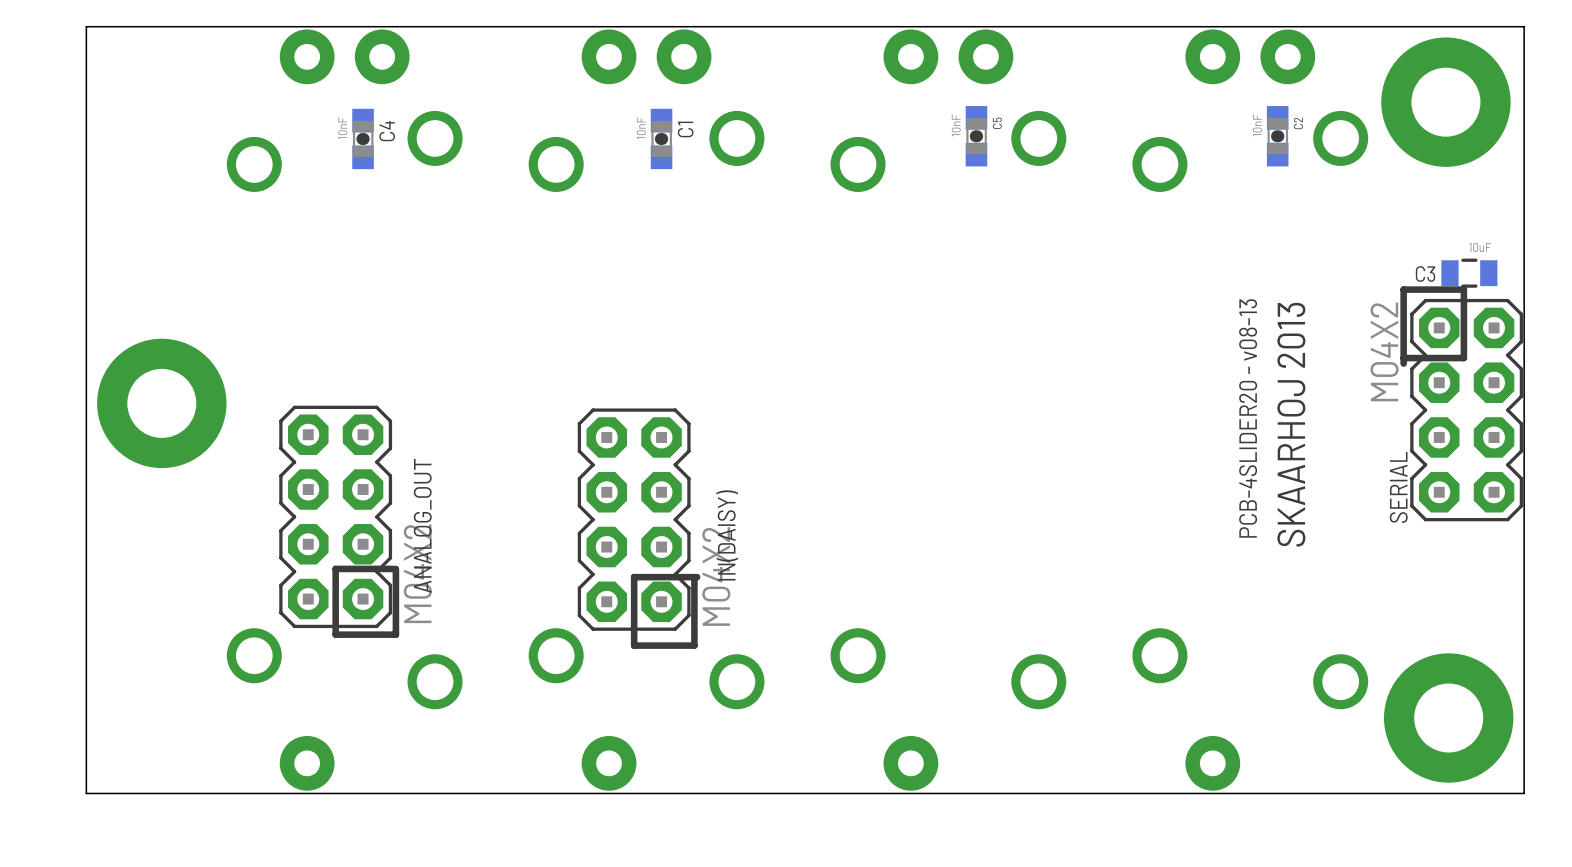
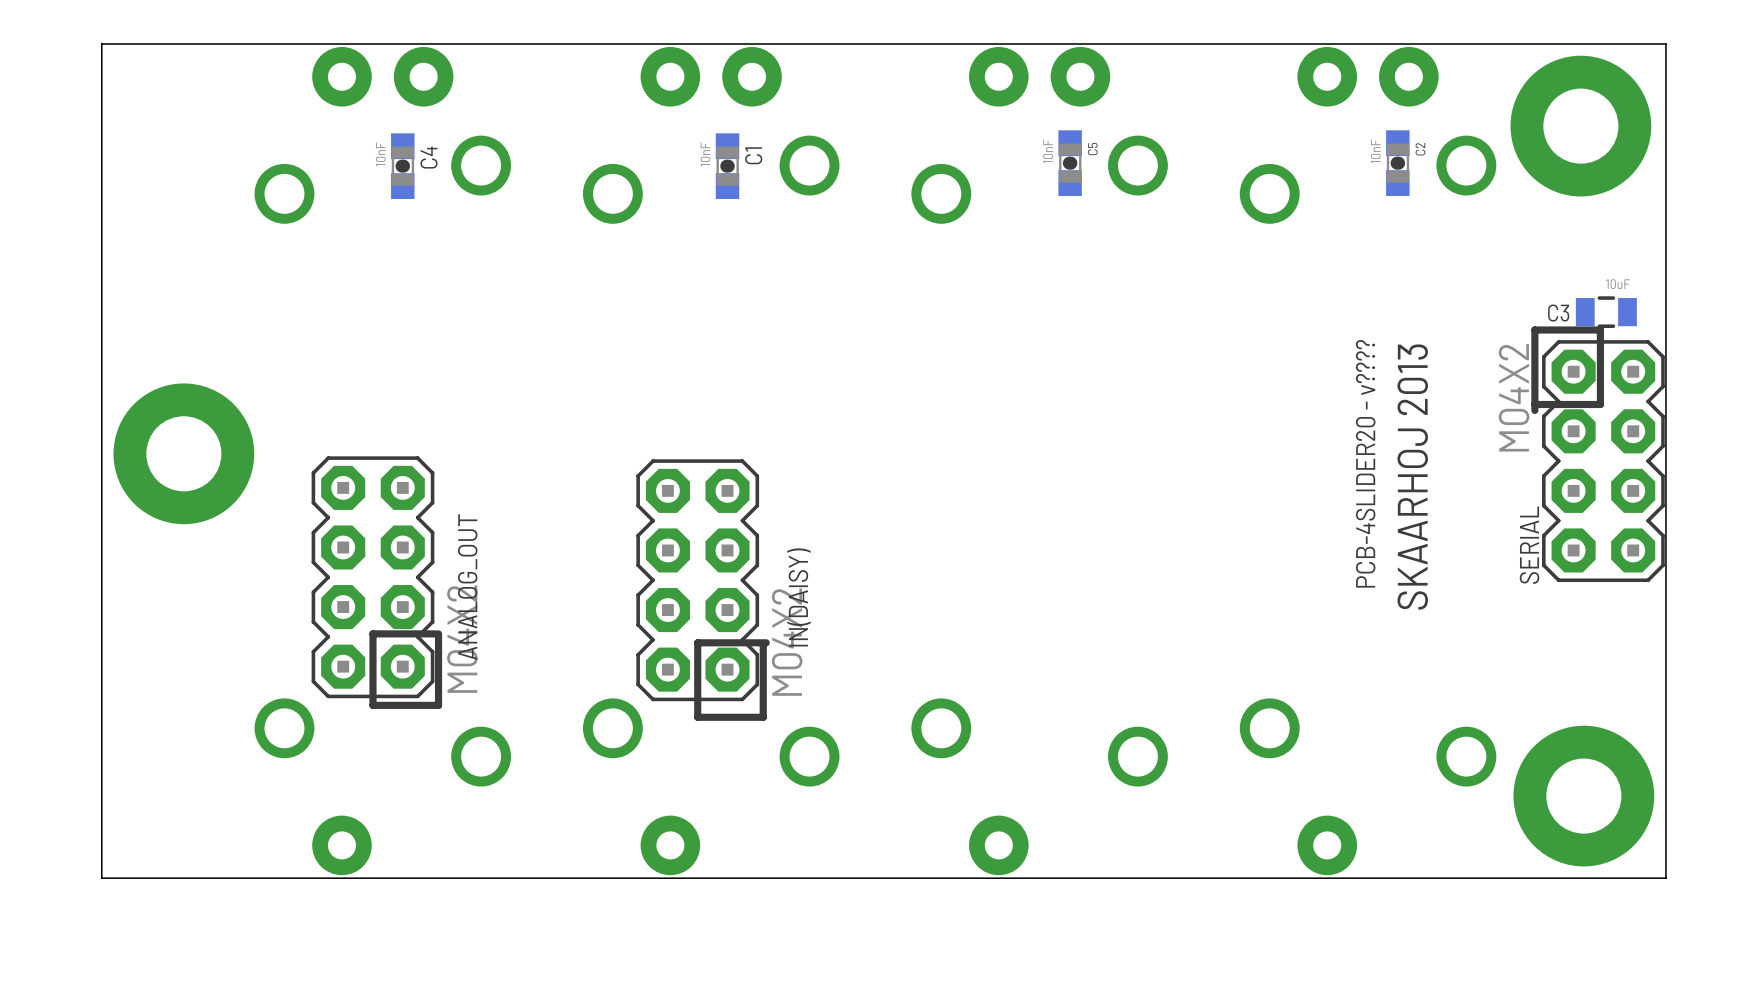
text: PCB-4SLIDER20 - v08-13 (1248, 418) -> PCB-4SLIDER20 - v???? (1365, 463)

